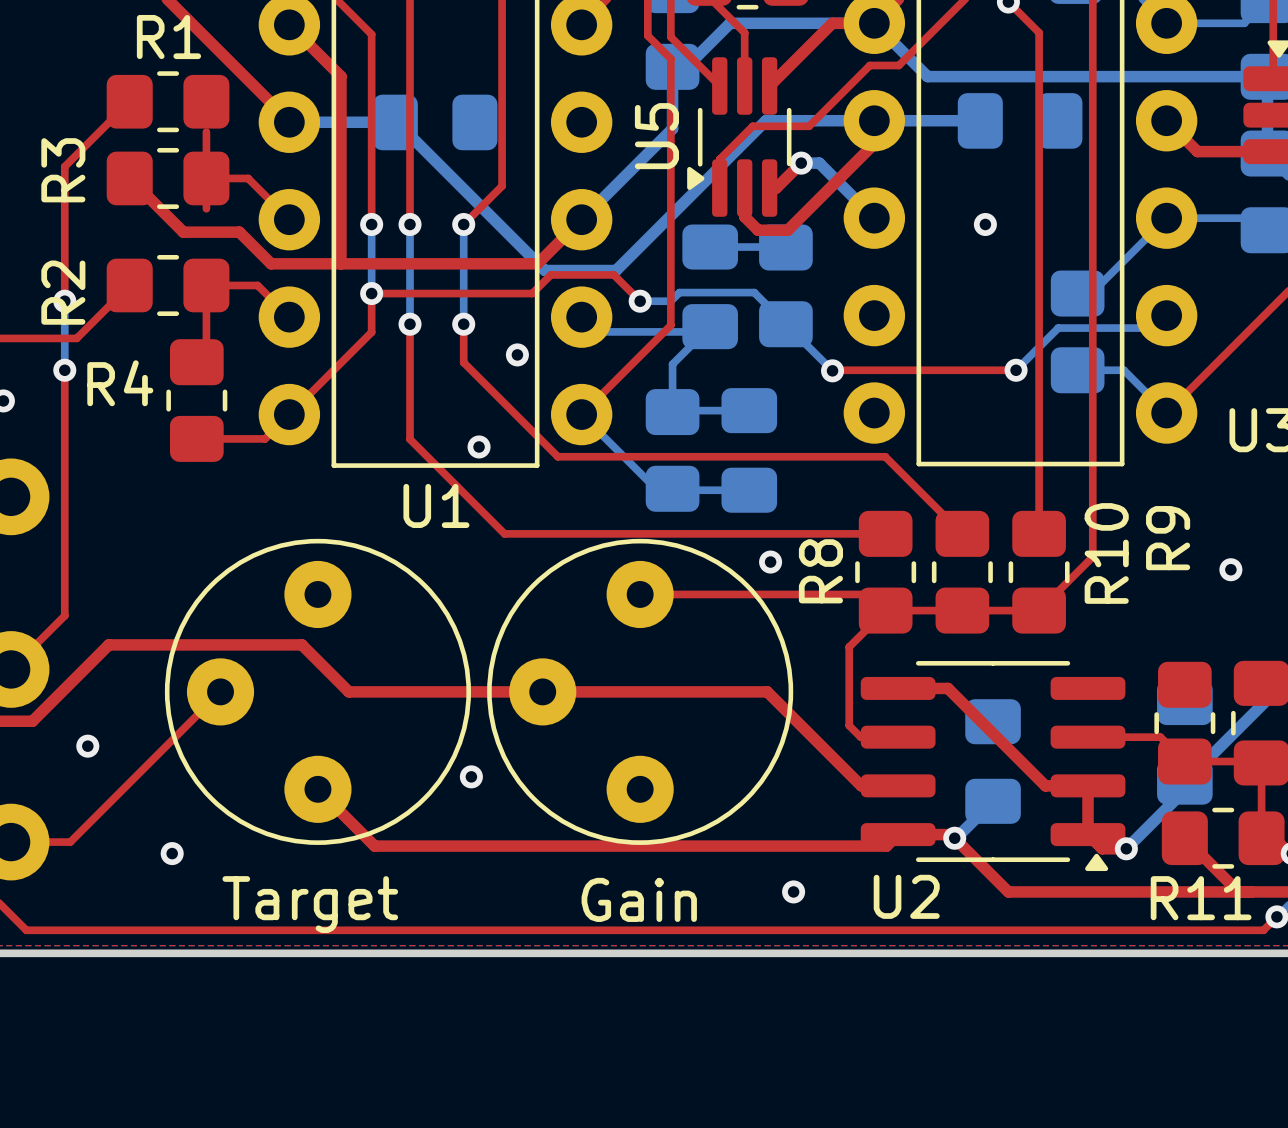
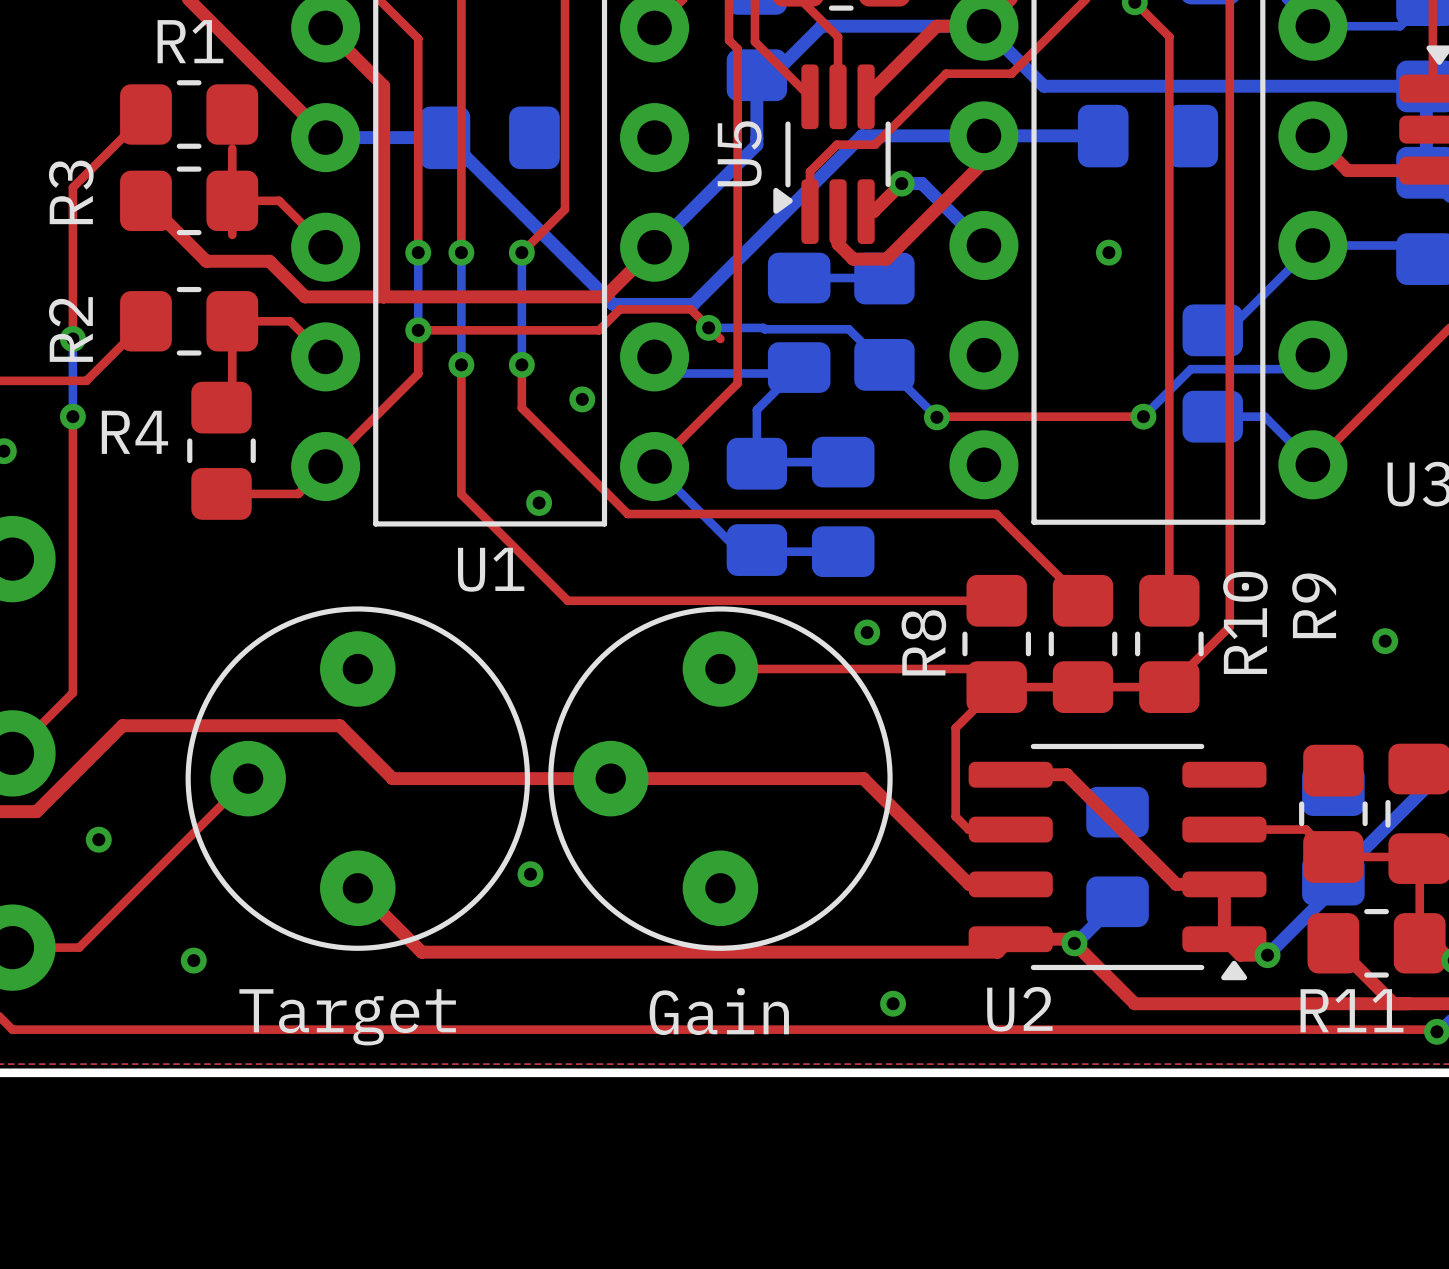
top track: (655, 43) (670, 58) (670, 325) (655, 340) -> (737, 48) (737, 383)
top track: (869, 65) (809, 126) (752, 126) (719, 159) -> (978, 73) (946, 73) (875, 144) (836, 144) (809, 171) (809, 179)
bottom track: (679, 292) (670, 301) (640, 301) -> (764, 329) (708, 327)
via position: (640, 301) -> (708, 327)
top track: (11, 914) (26, 930) (1263, 930) (1276, 916) -> (12, 1029) (1434, 1029) (1436, 1031)

